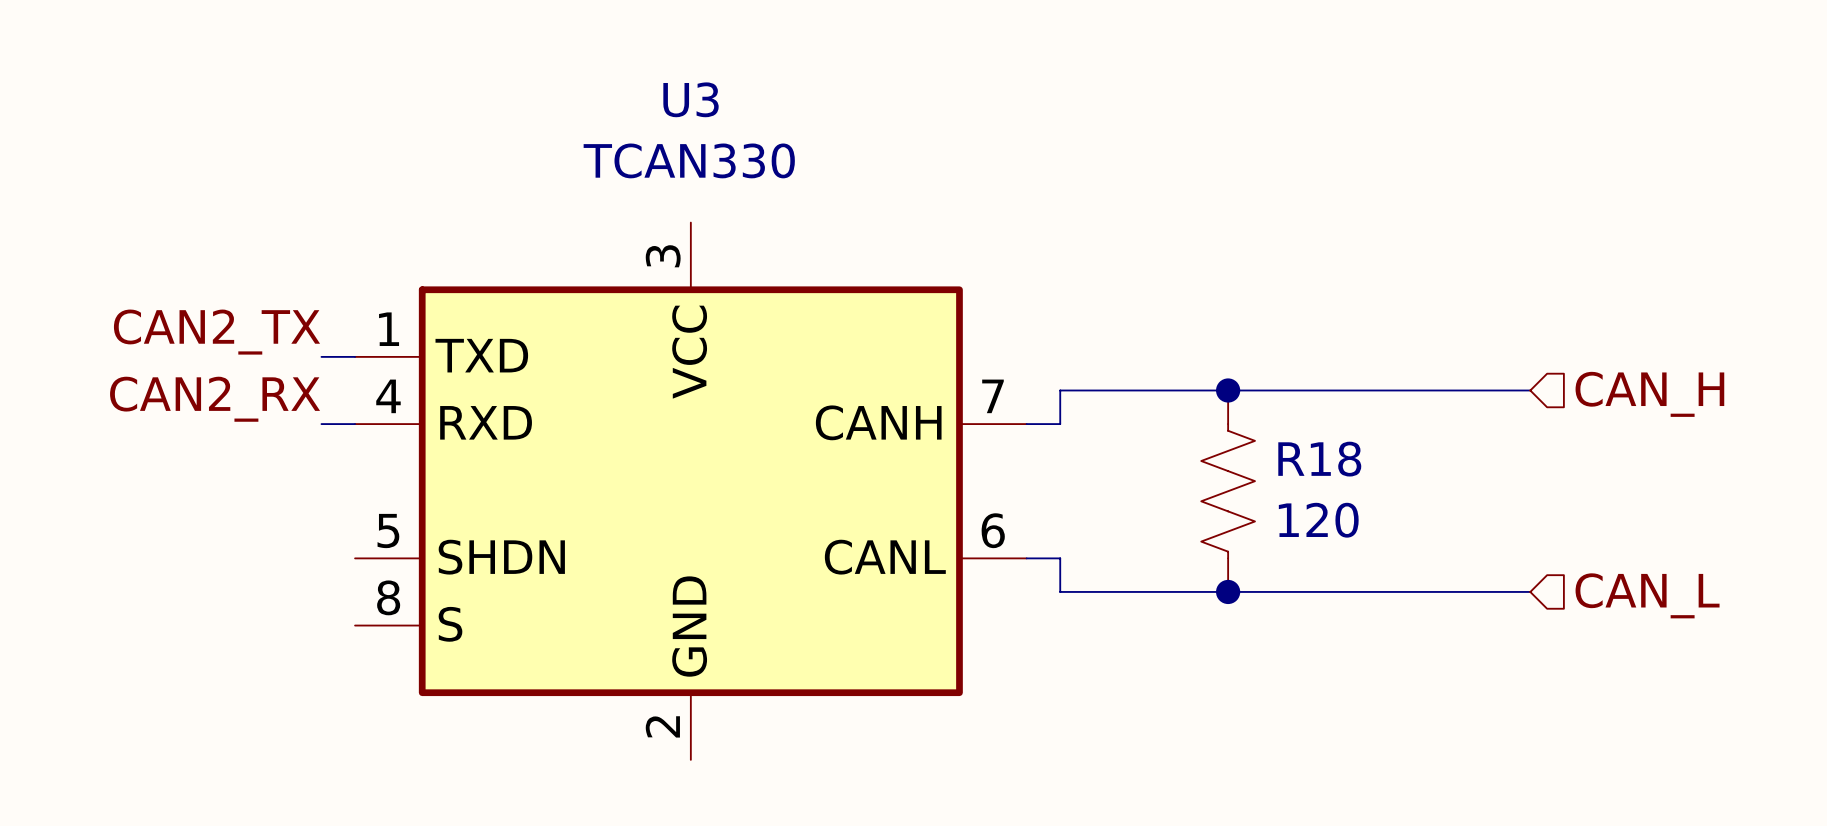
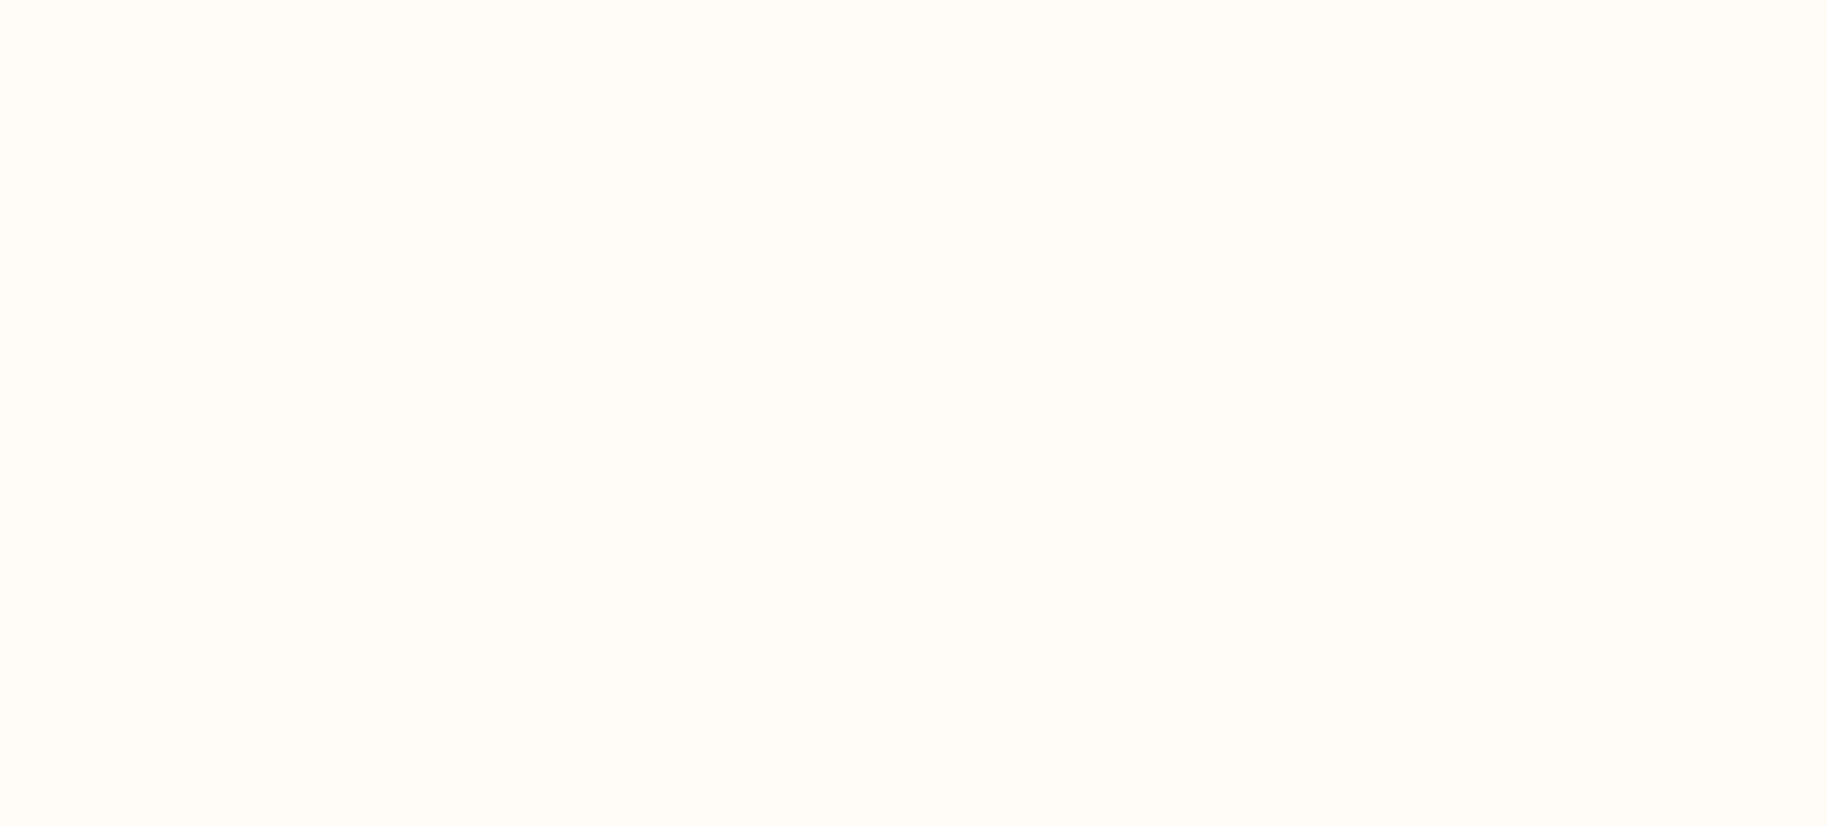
label: CAN2_TX (216, 332) -> none
wire: (321, 356) (355, 356) -> none
junction: (1228, 390) -> none
wire: (1530, 390) (1060, 390) (1060, 424) (1026, 424) -> none
hierarchical label: CAN_H (1649, 394) -> none
label: CAN2_RX (215, 399) -> none
wire: (321, 424) (355, 424) -> none
U3: TCAN330 (690, 491) -> none
R18: 120 (1228, 491) -> none
wire: (1026, 558) (1060, 558) (1060, 591) (1530, 591) -> none
junction: (1228, 591) -> none
hierarchical label: CAN_L (1647, 595) -> none

